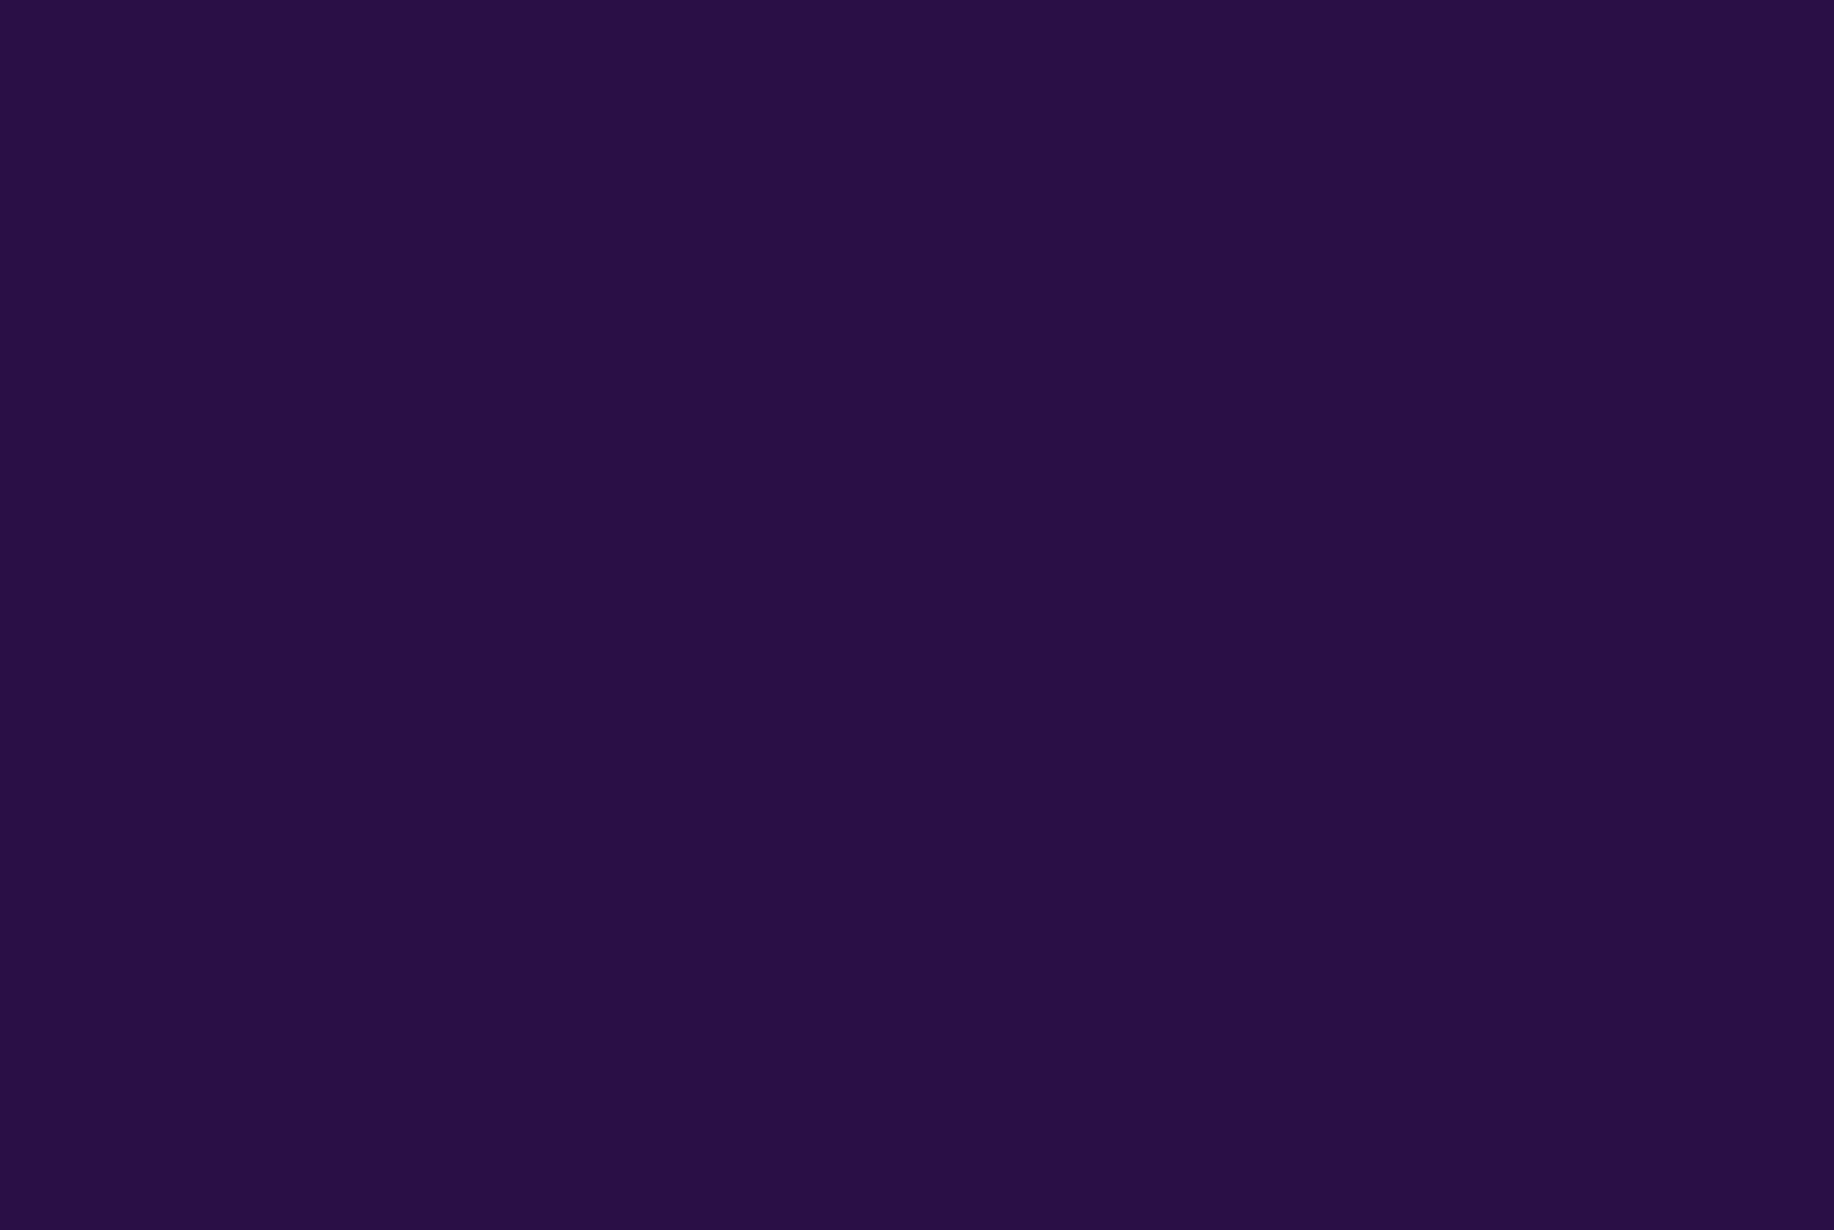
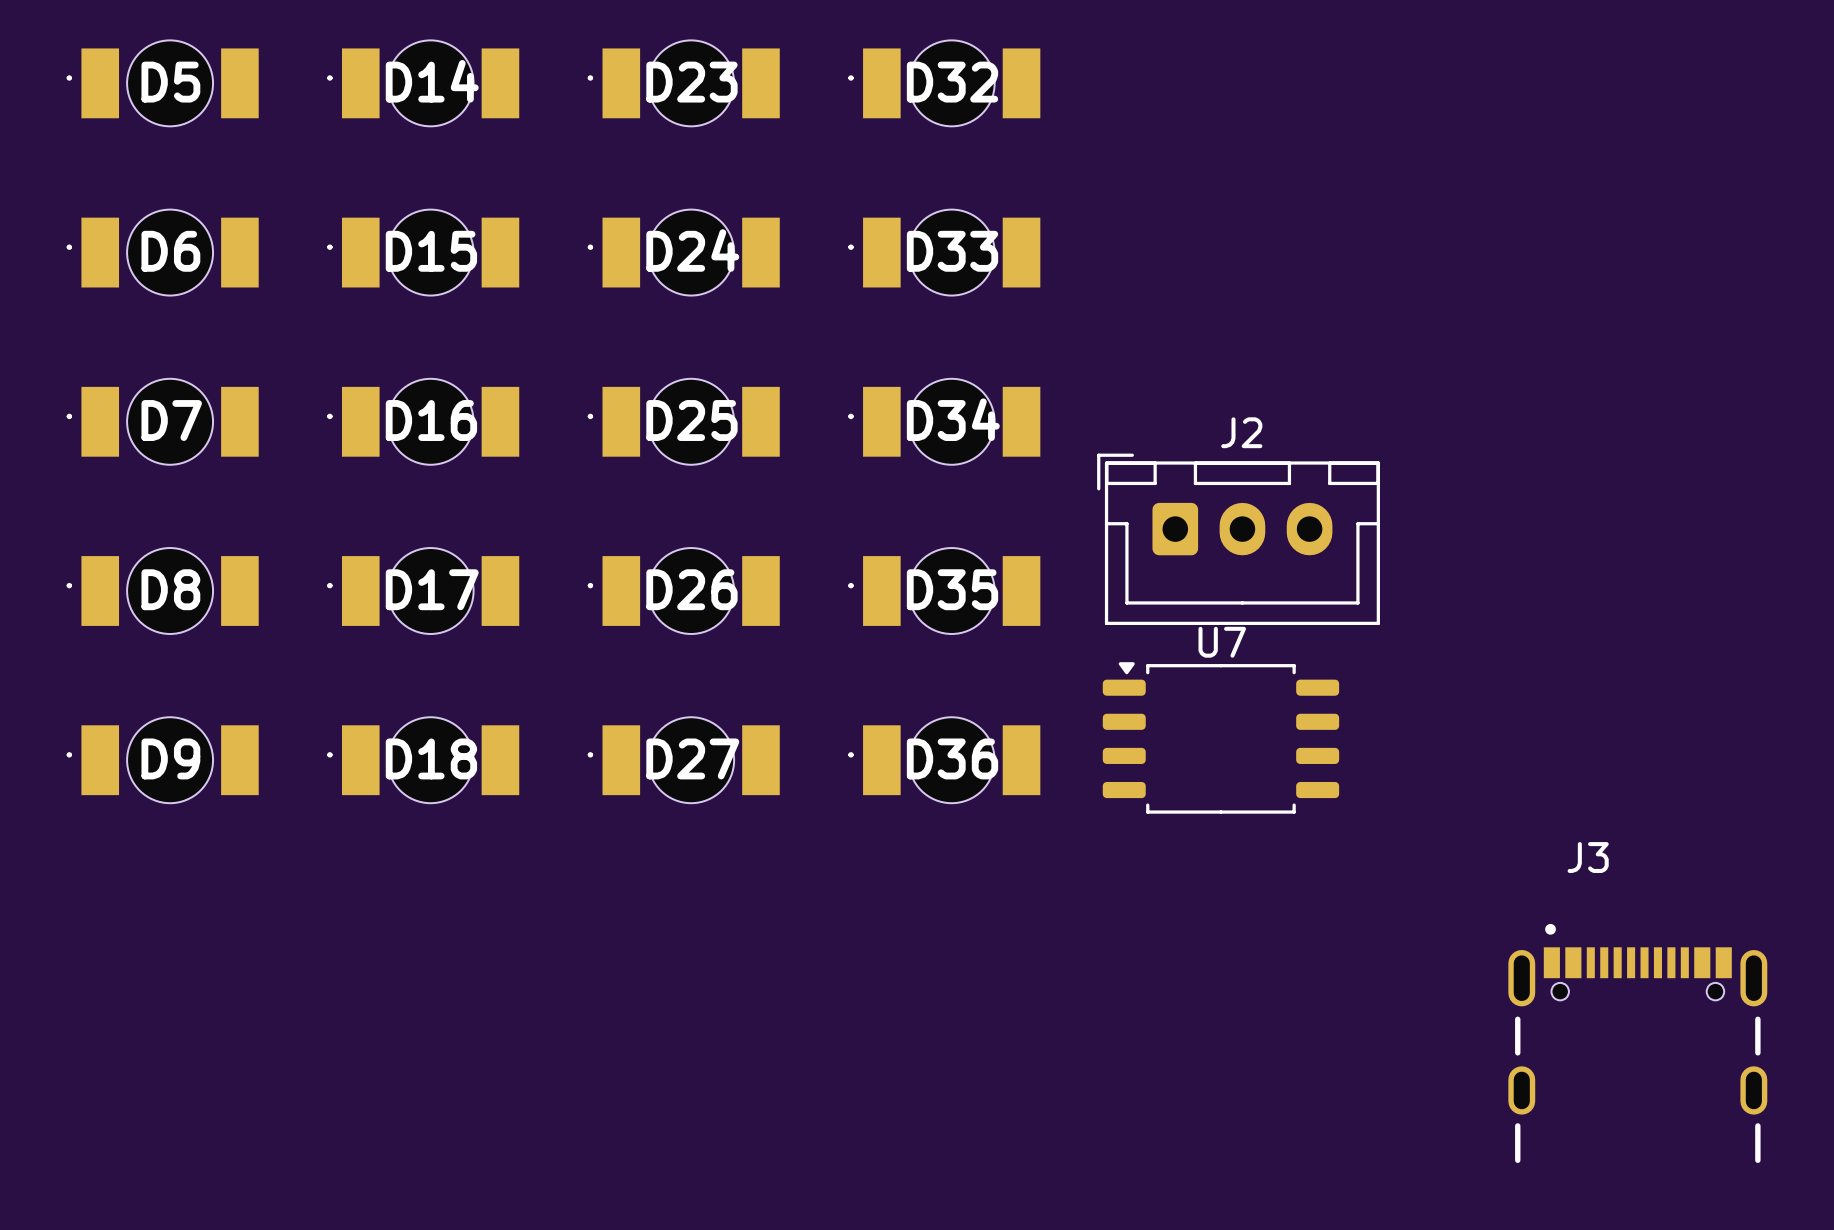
D5: none -> (162, 83)
D14: none -> (423, 83)
D23: none -> (683, 83)
D32: none -> (944, 83)
D6: none -> (162, 252)
D15: none -> (423, 252)
D24: none -> (683, 252)
D33: none -> (944, 252)
D7: none -> (162, 421)
D16: none -> (423, 421)
D25: none -> (683, 421)
D34: none -> (944, 421)
J2: none -> (1238, 539)
D8: none -> (162, 591)
D17: none -> (423, 591)
D26: none -> (683, 591)
D35: none -> (944, 591)
U7: none -> (1220, 737)
D9: none -> (162, 760)
D18: none -> (423, 760)
D27: none -> (683, 760)
D36: none -> (944, 760)
J3: none -> (1637, 1043)

